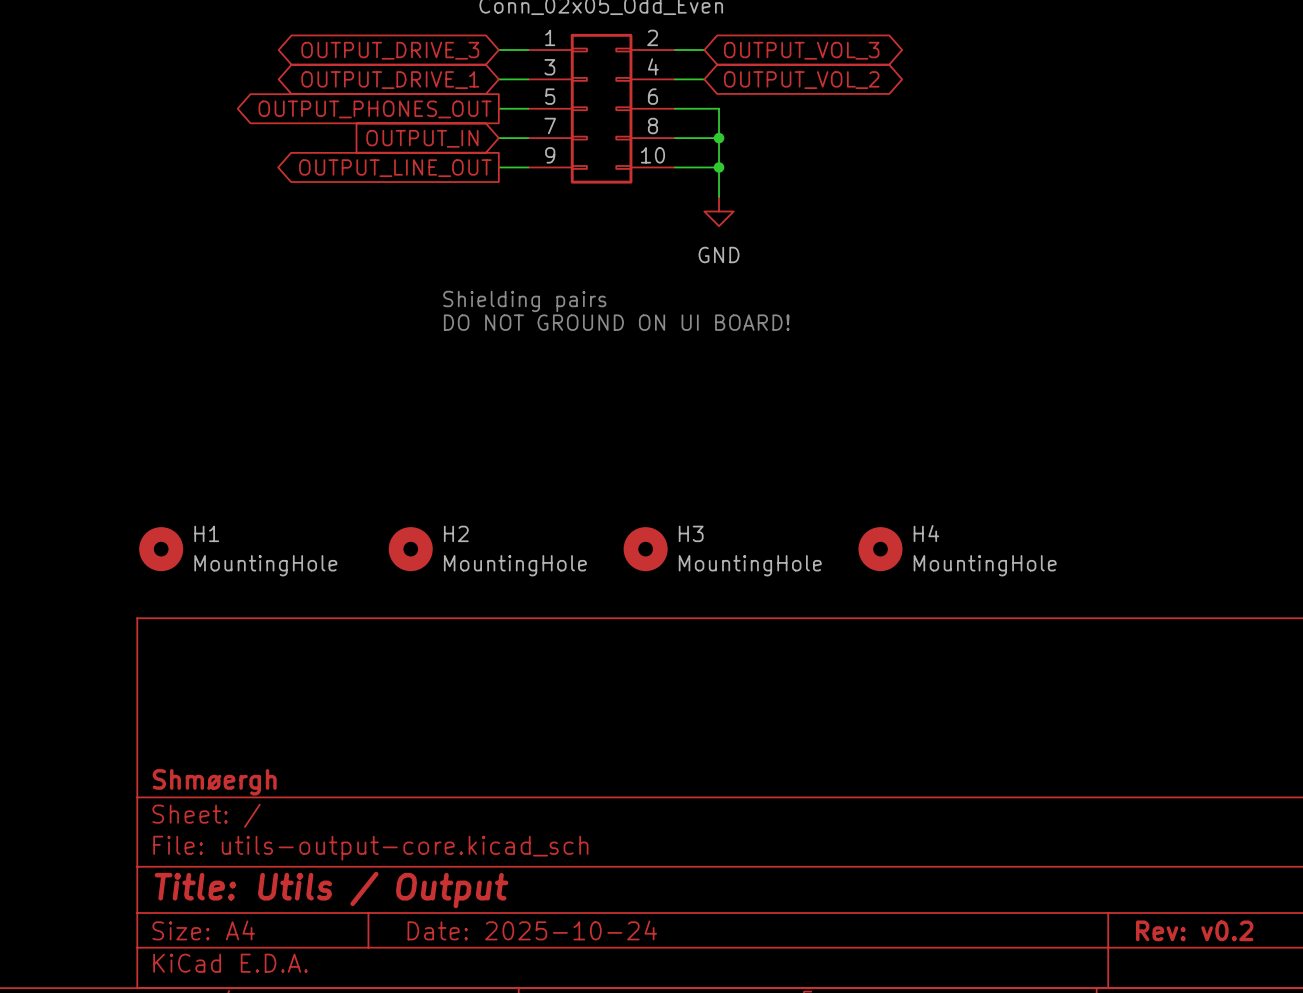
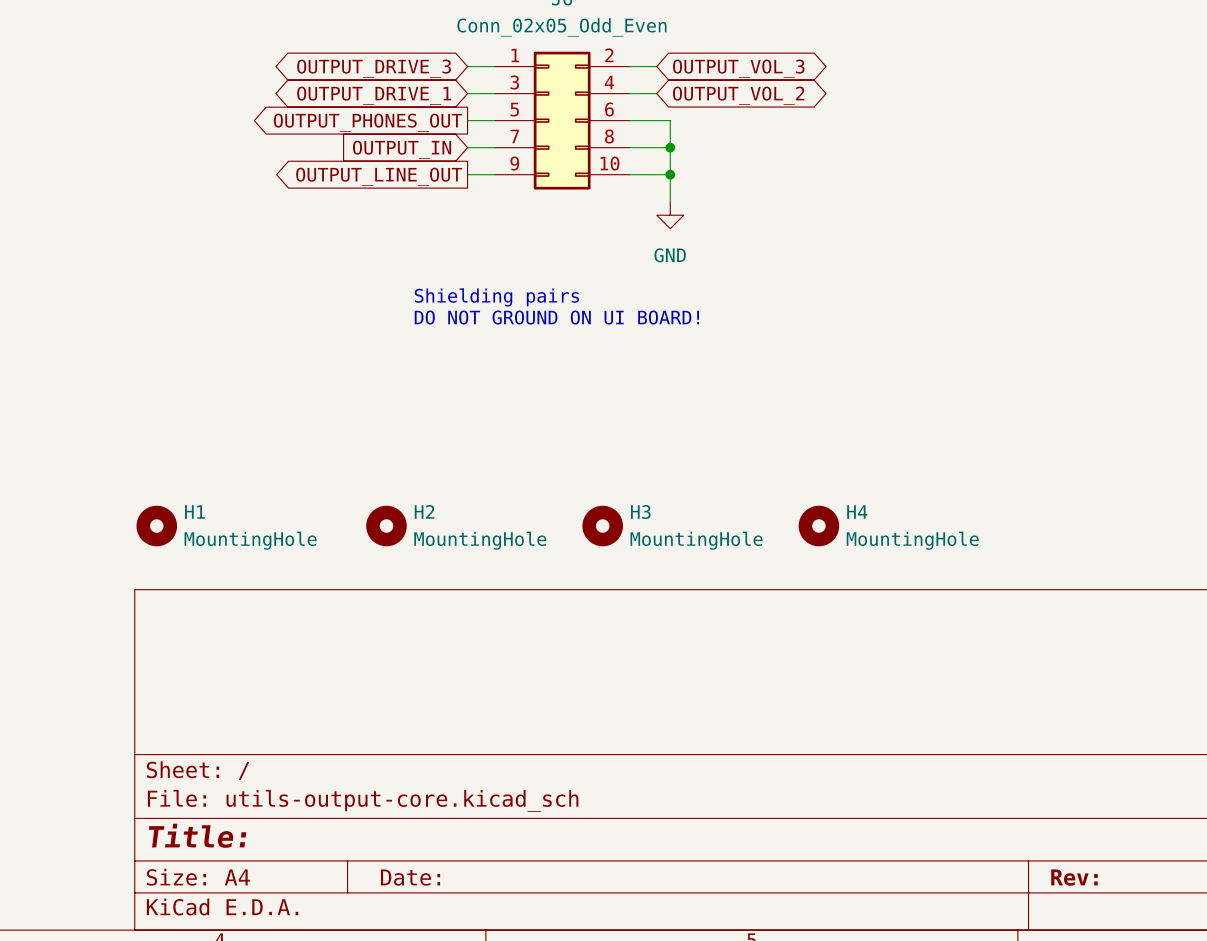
title block: Shmøergh (214, 782) -> none
title block: Title: Utils / Output (331, 890) -> Title: (197, 835)
title block: Date: 2025-10-24 (532, 930) -> Date: (410, 877)
title block: Rev: v0.2 (1194, 930) -> Rev: (1074, 877)

